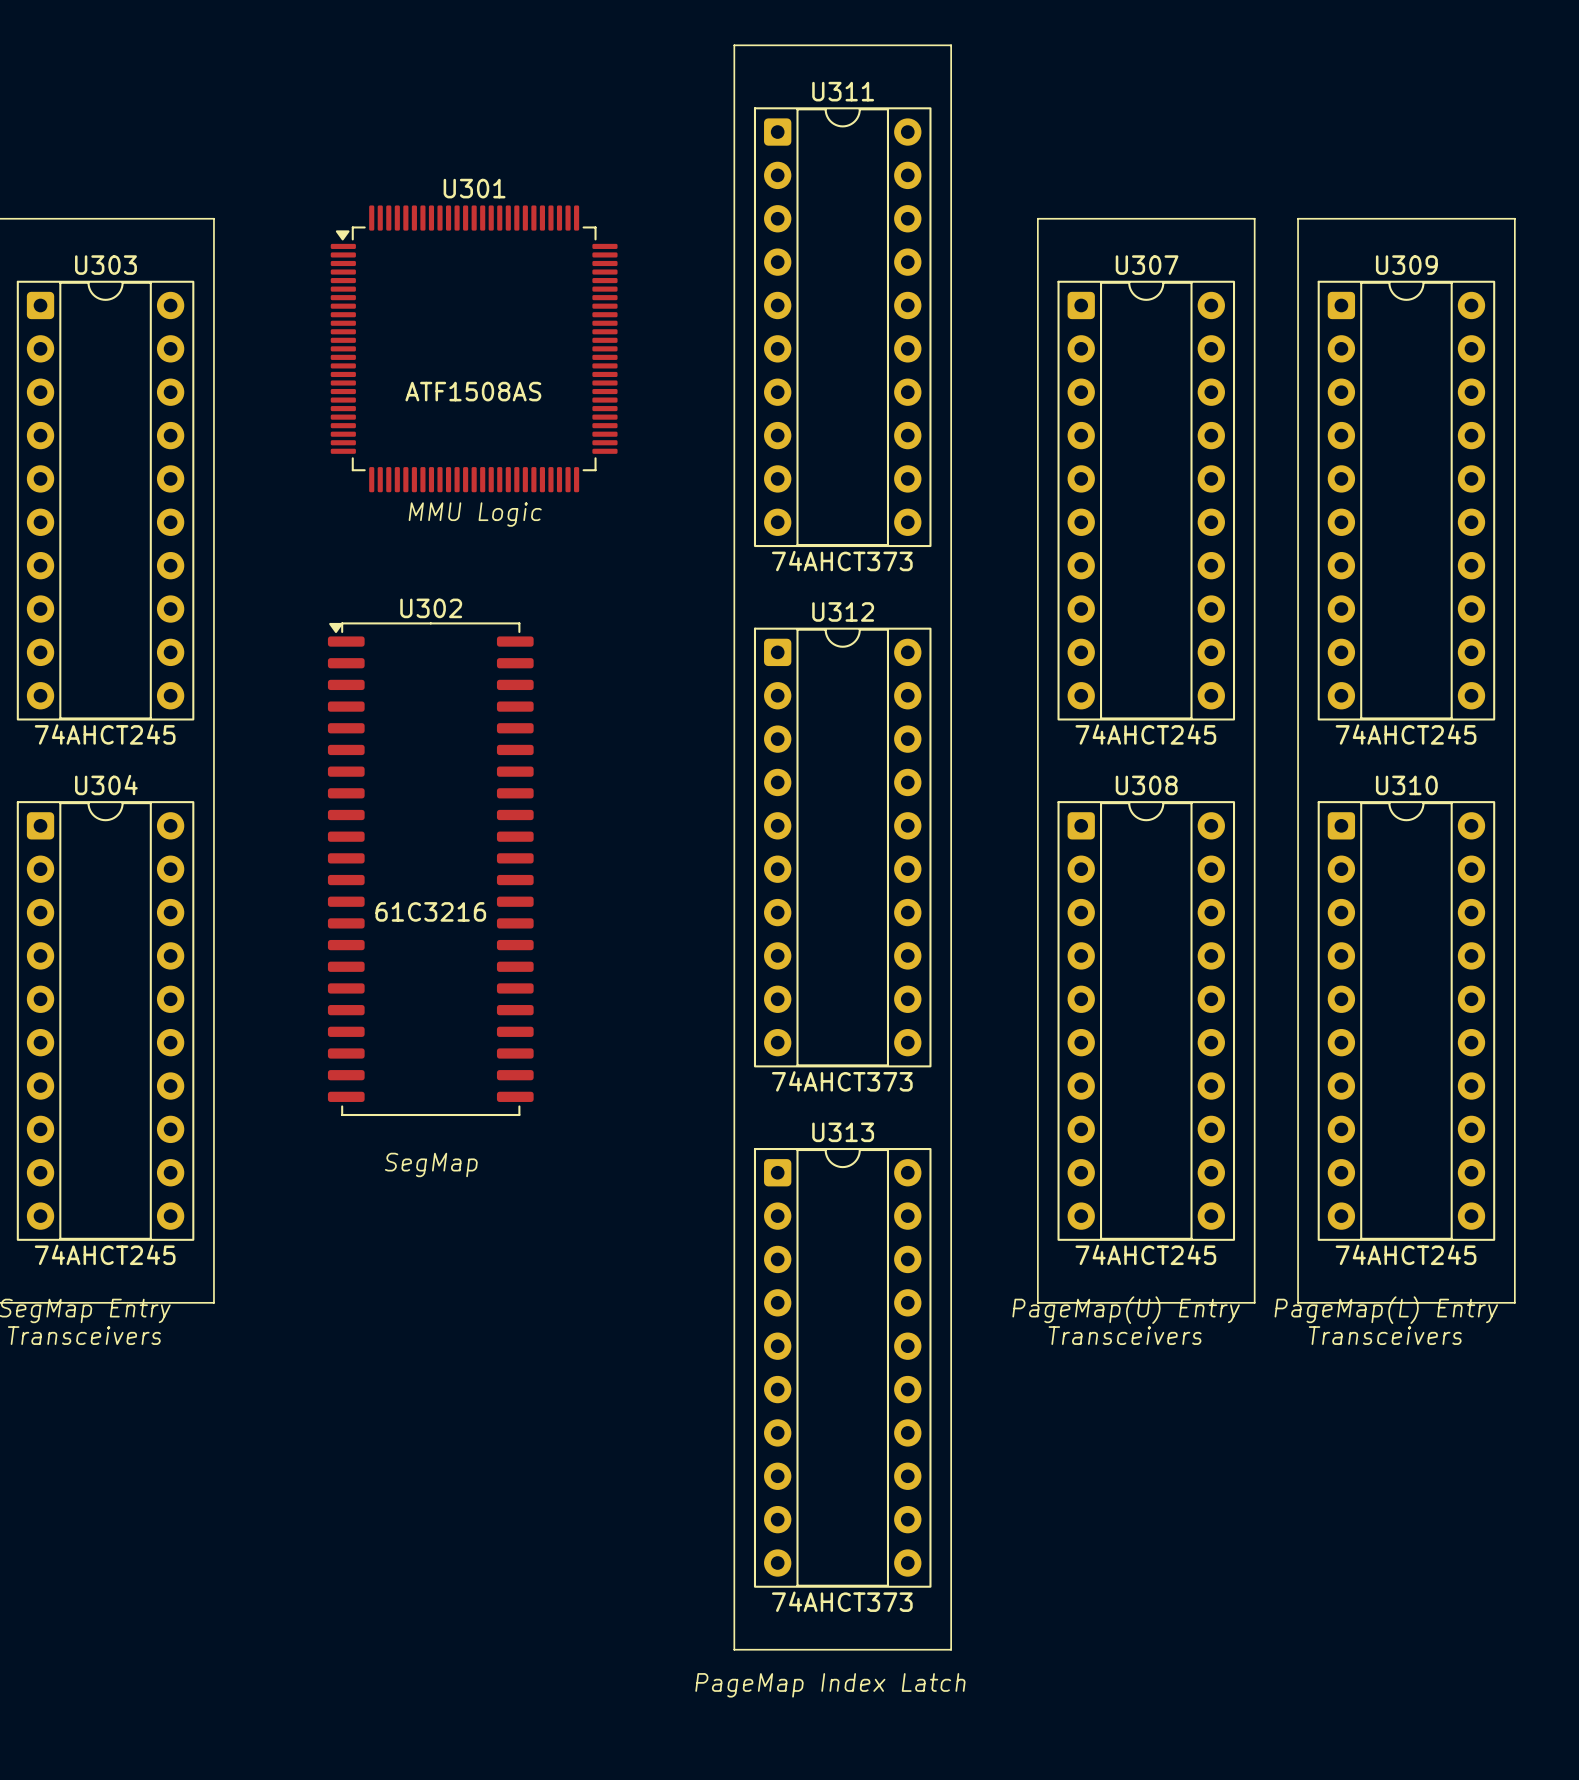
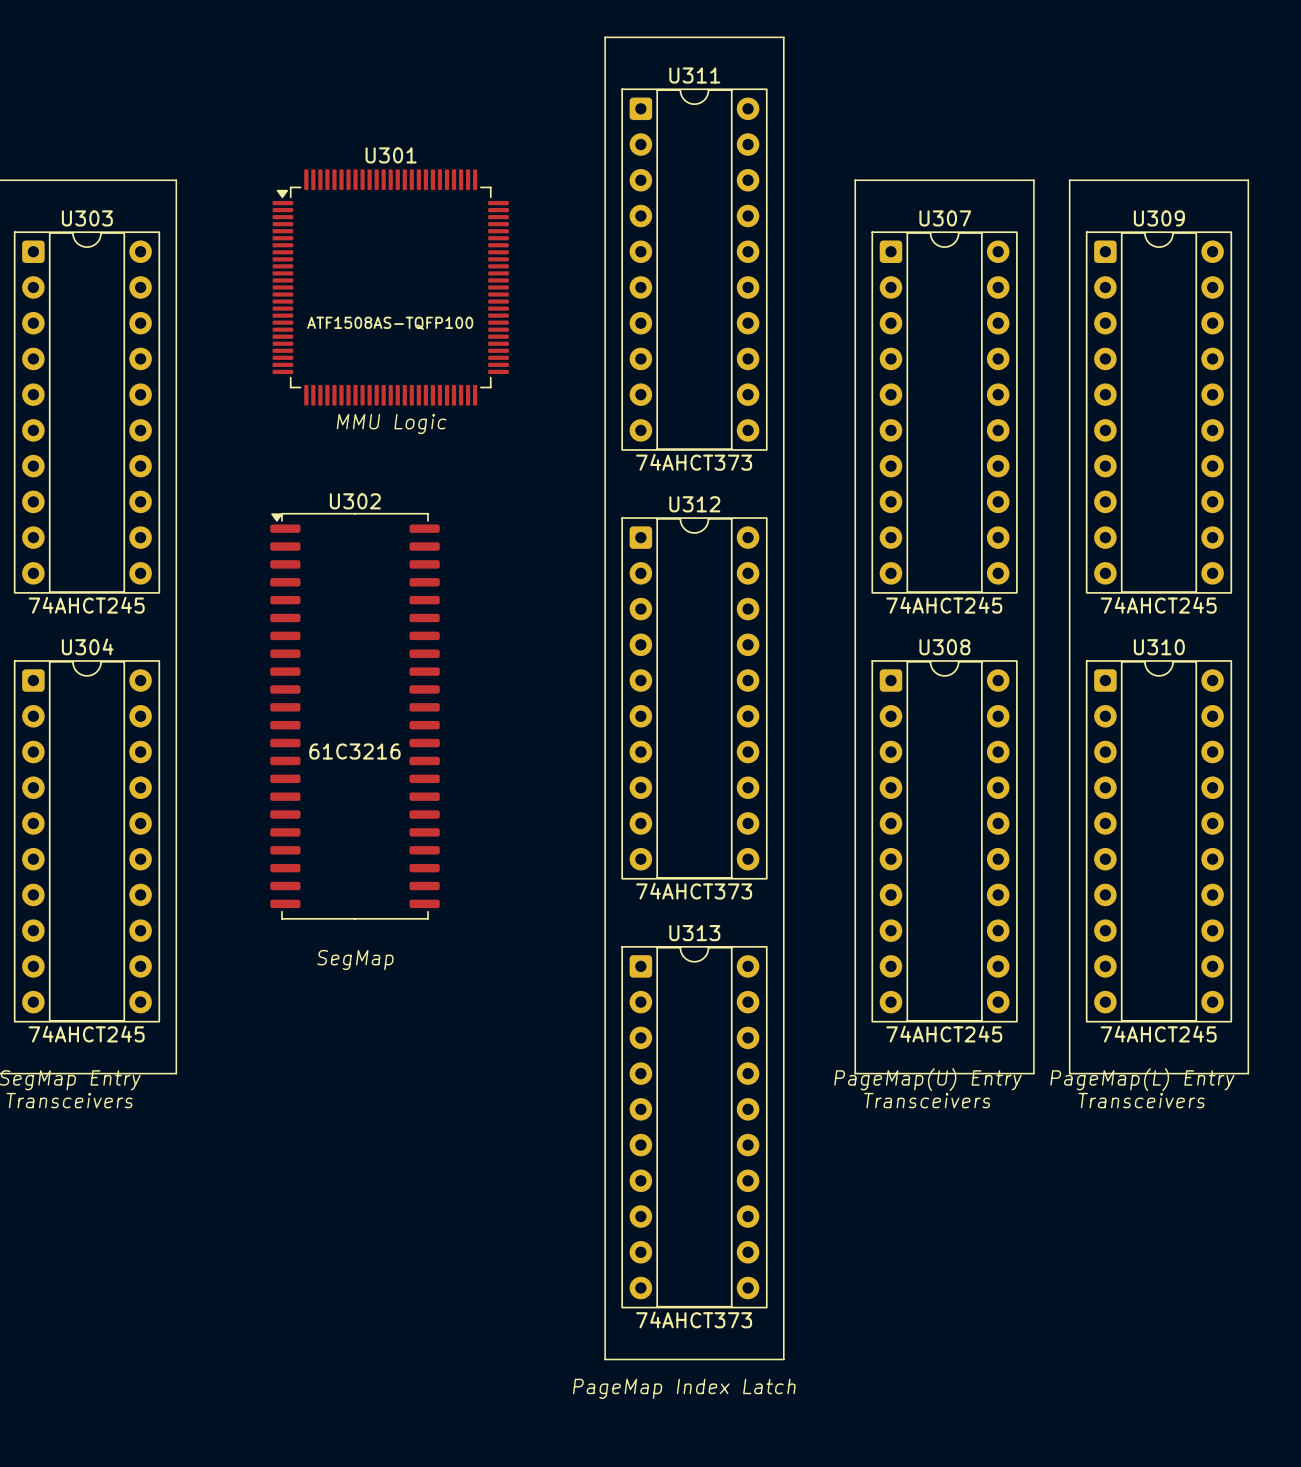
U301 value: ATF1508AS (473, 391) -> ATF1508AS-TQFP100 (390, 323)

